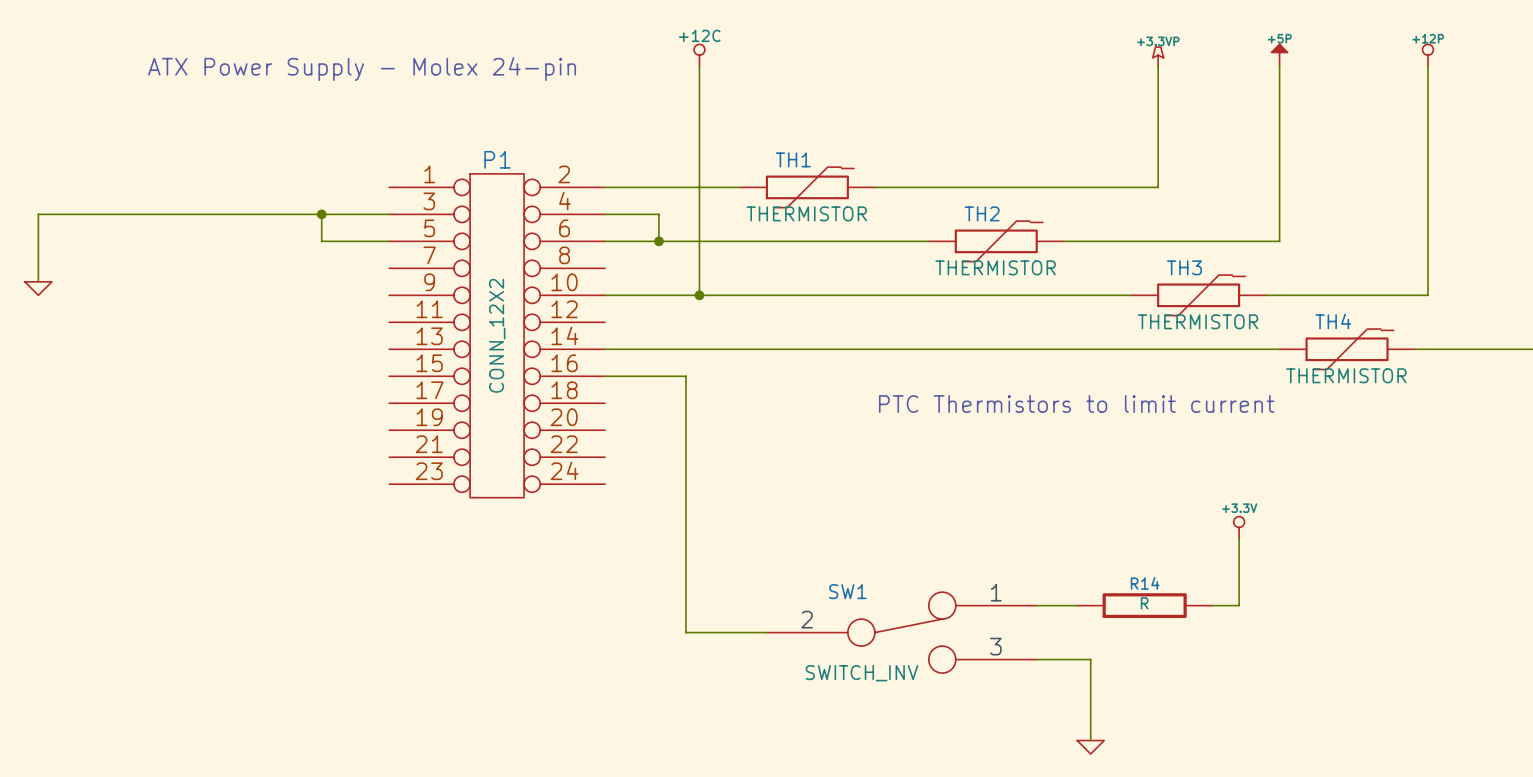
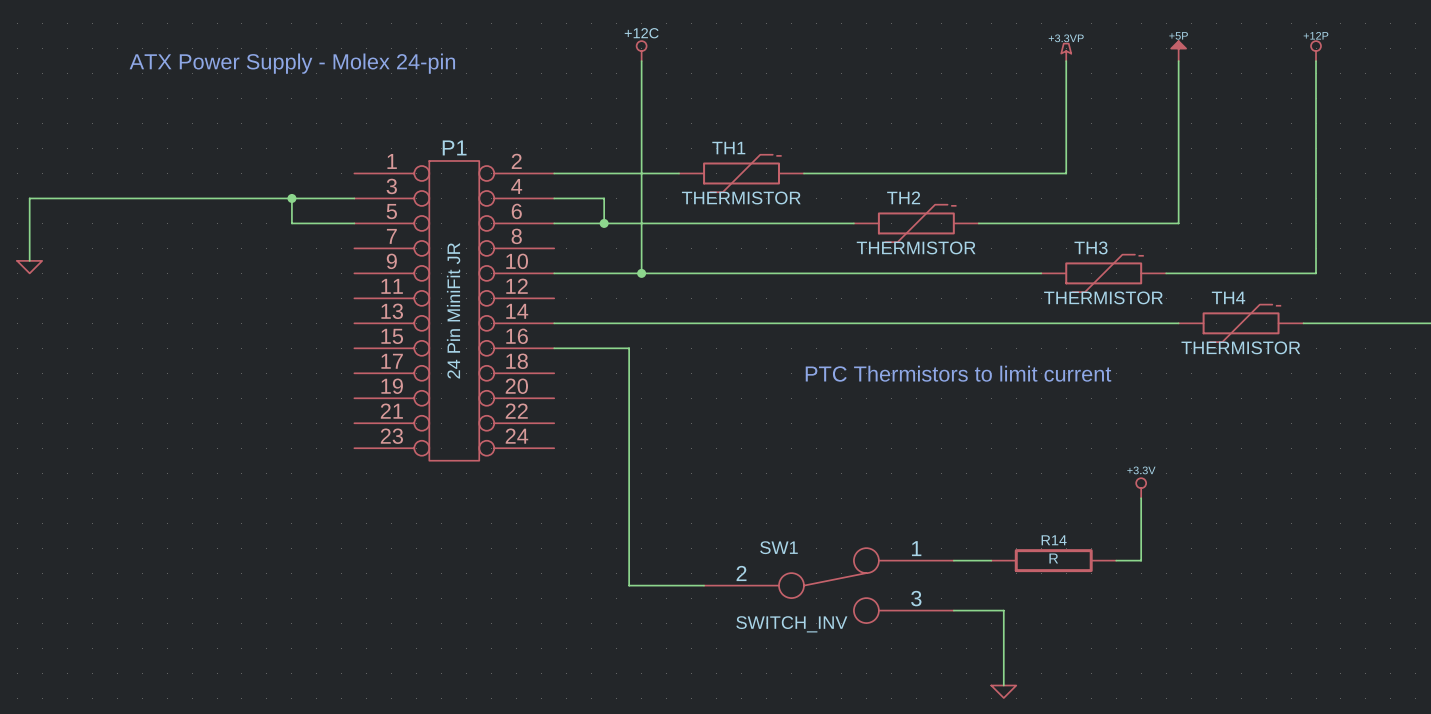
P1 value: CONN_12X2 (497, 335) -> 24 Pin MiniFit JR (453, 310)

